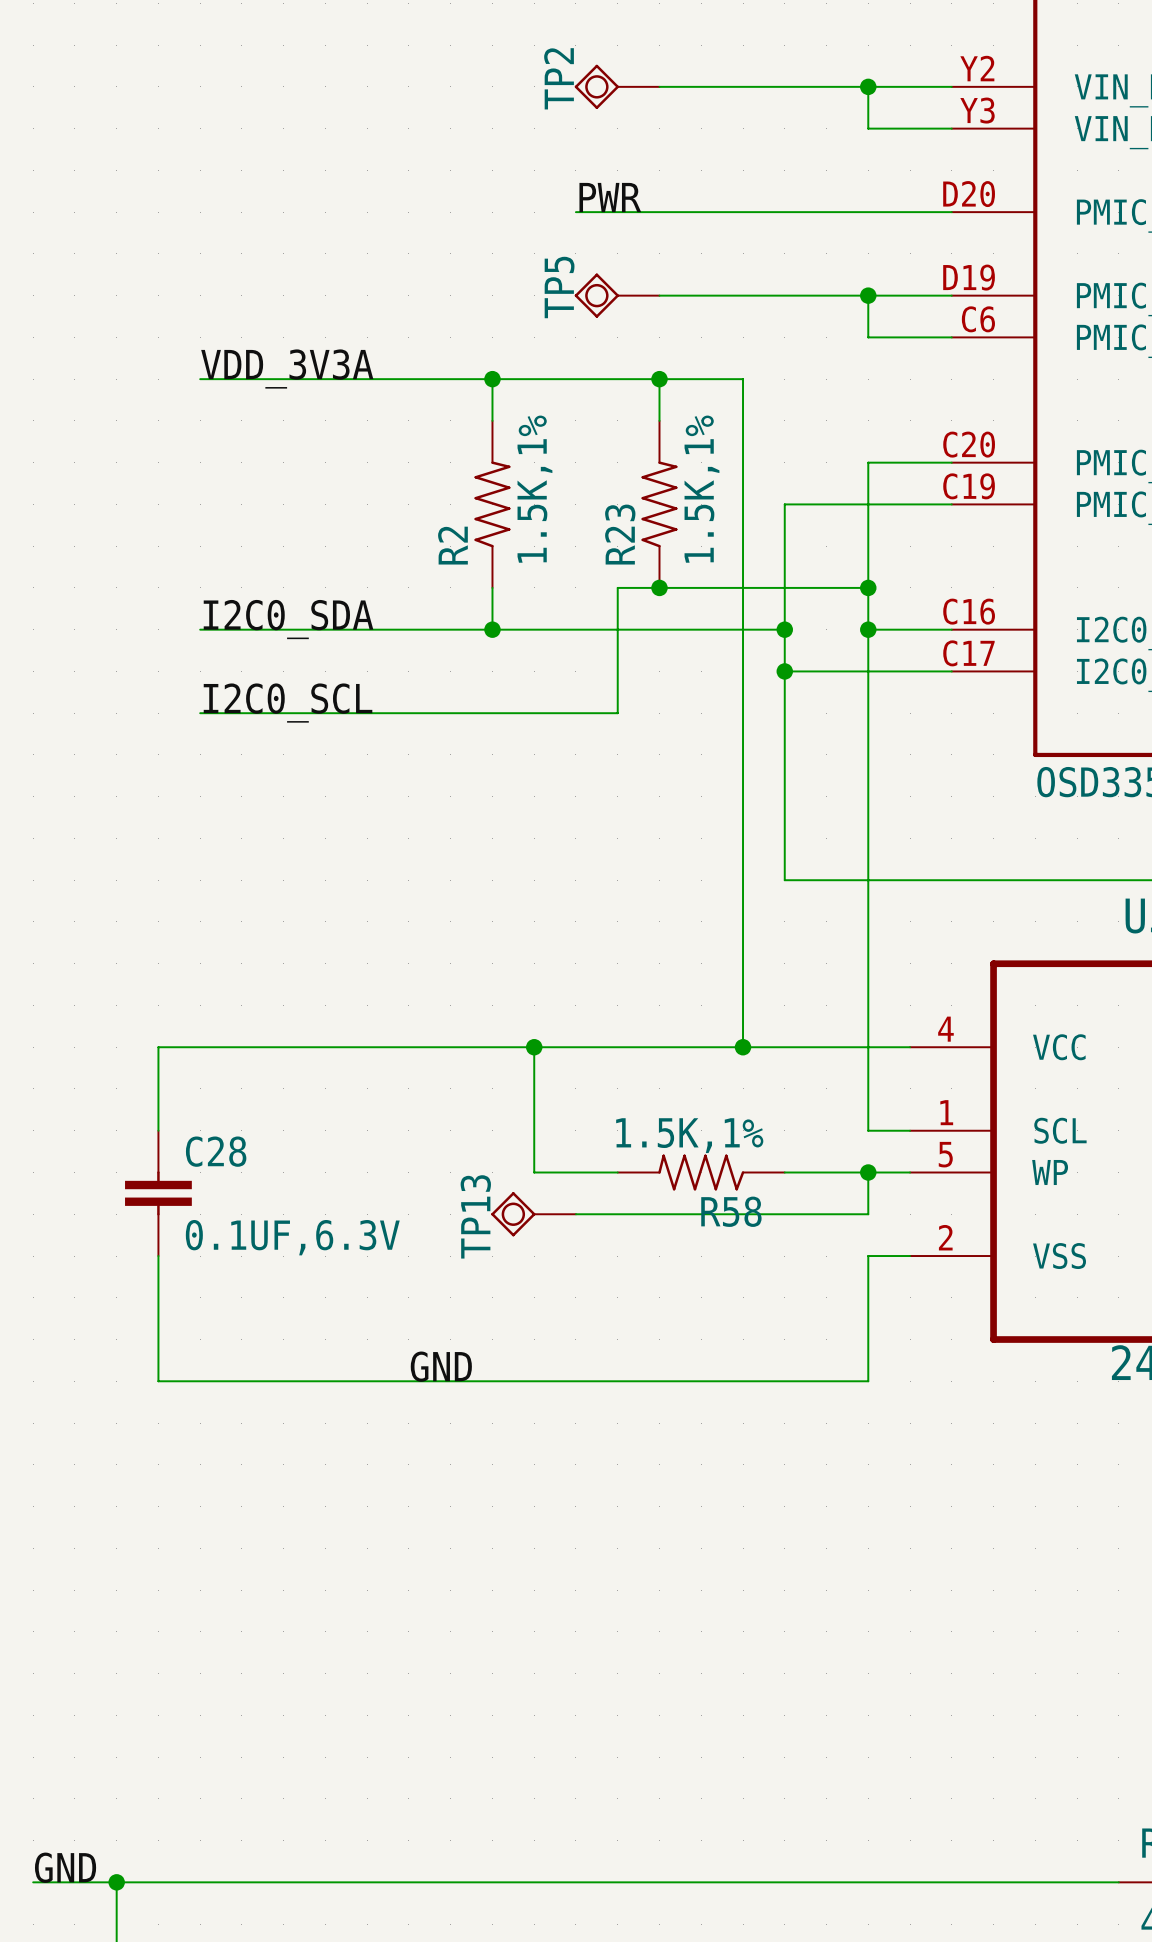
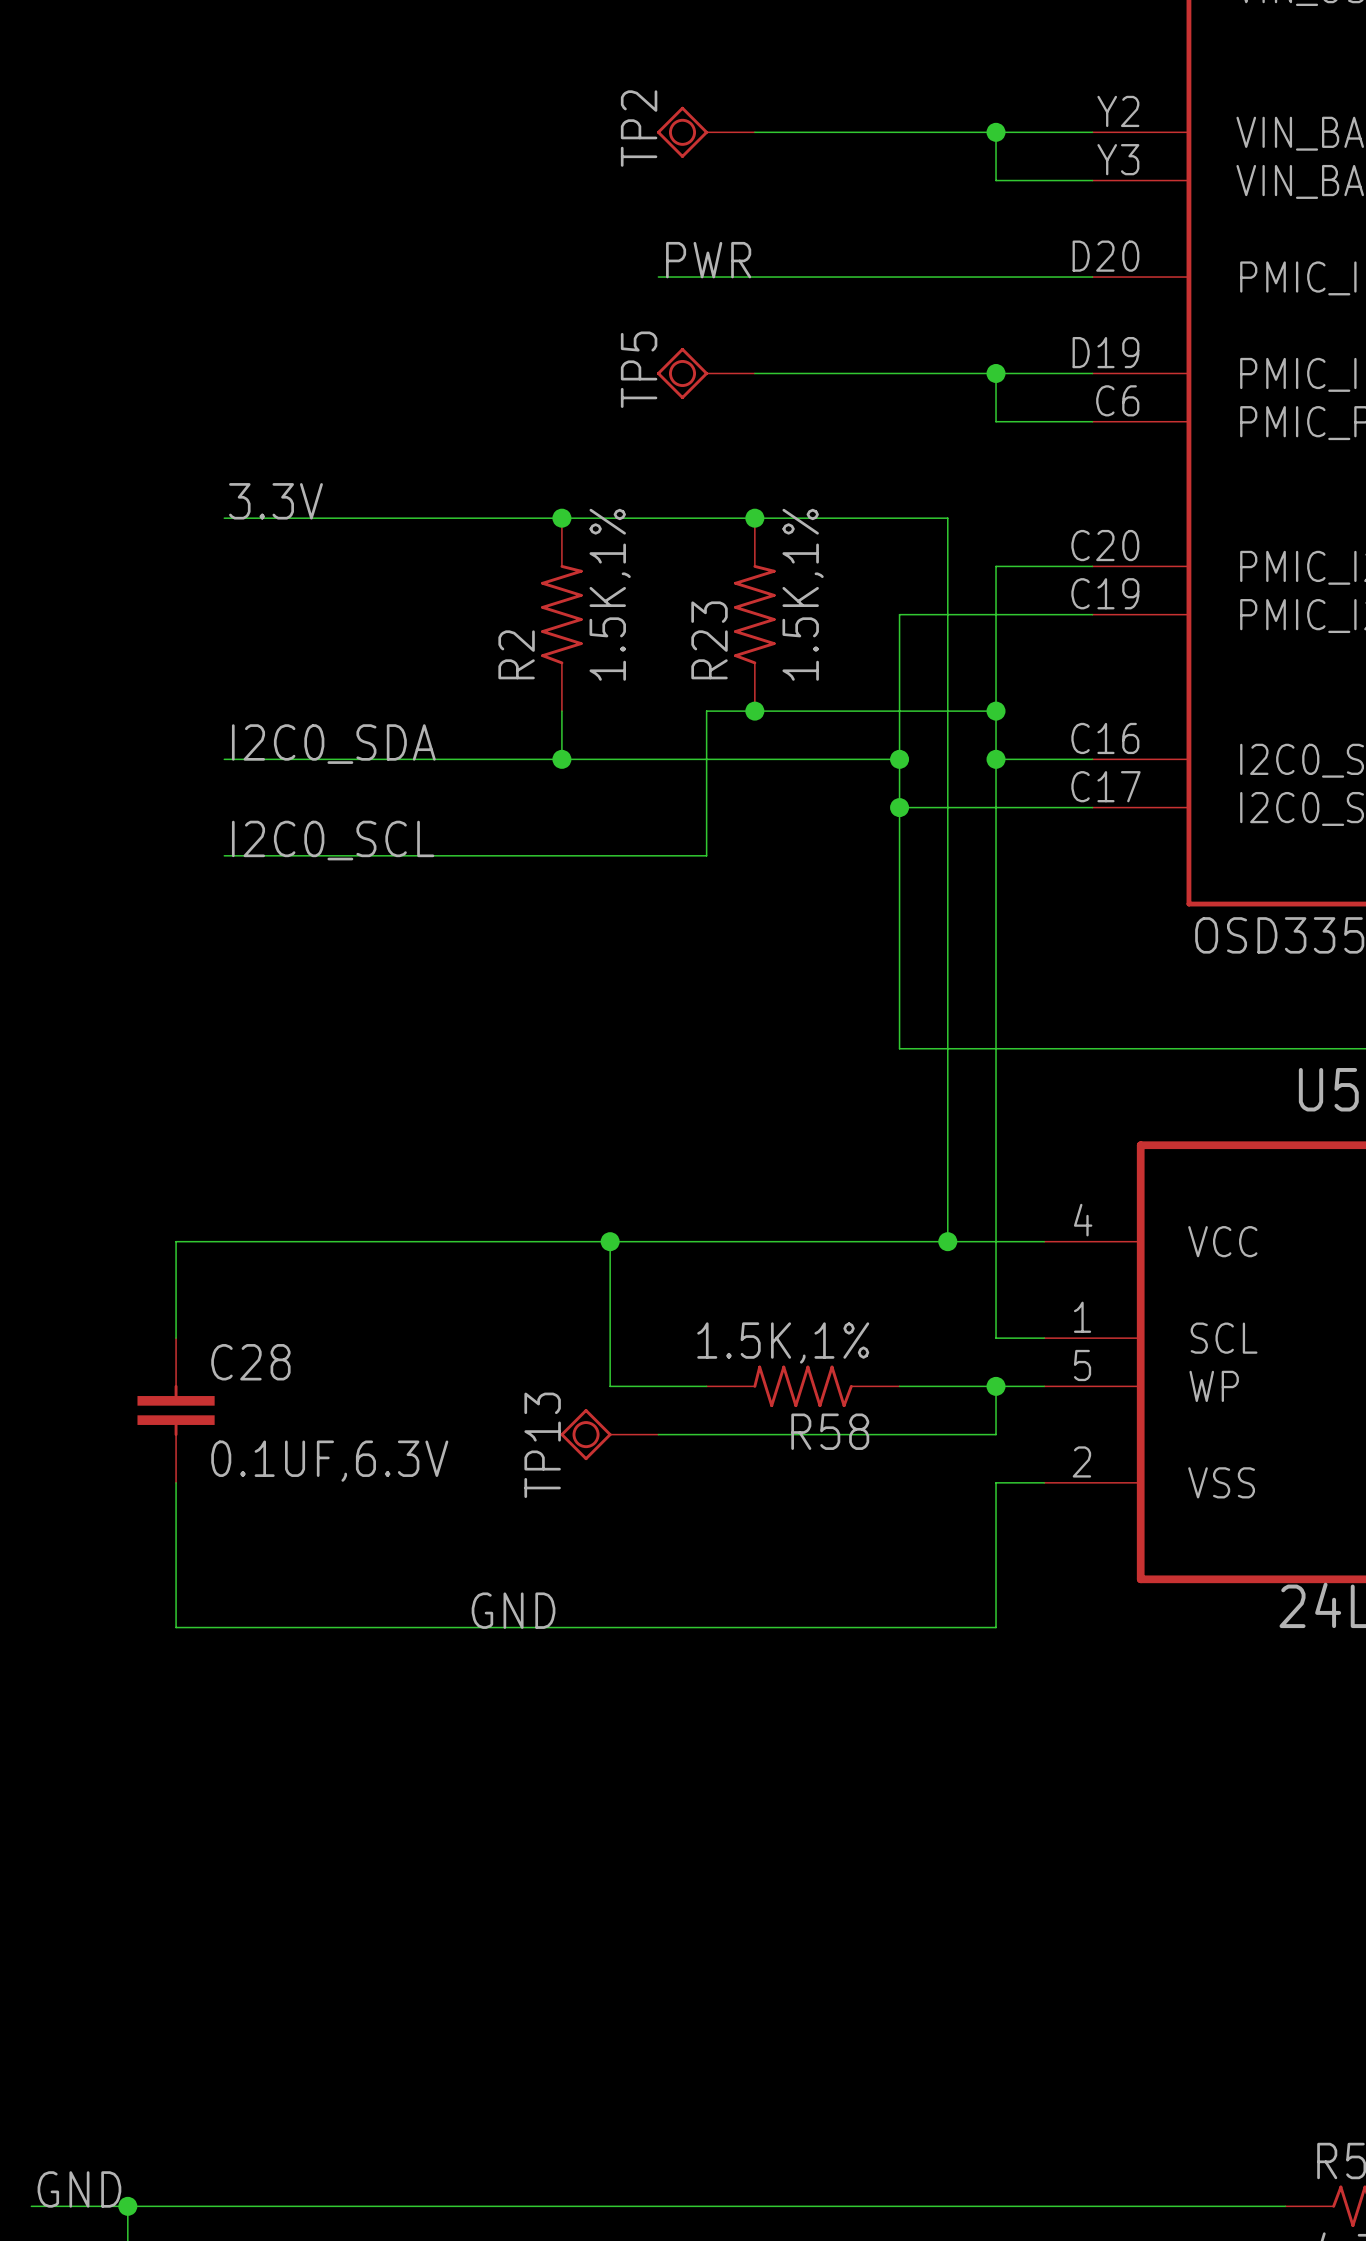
label: VDD_3V3A (287, 369) -> none
wire: (200, 379) (743, 379) (743, 1047) -> none
wire: (492, 379) (492, 420) -> none
junction position: (492, 379) -> (561, 518)
wire: (659, 379) (659, 420) -> none
junction position: (659, 379) -> (754, 518)
label: none -> 3.3V (275, 501)
wire: none -> (224, 518) (947, 518) (947, 1241)
junction position: (743, 1047) -> (947, 1241)

